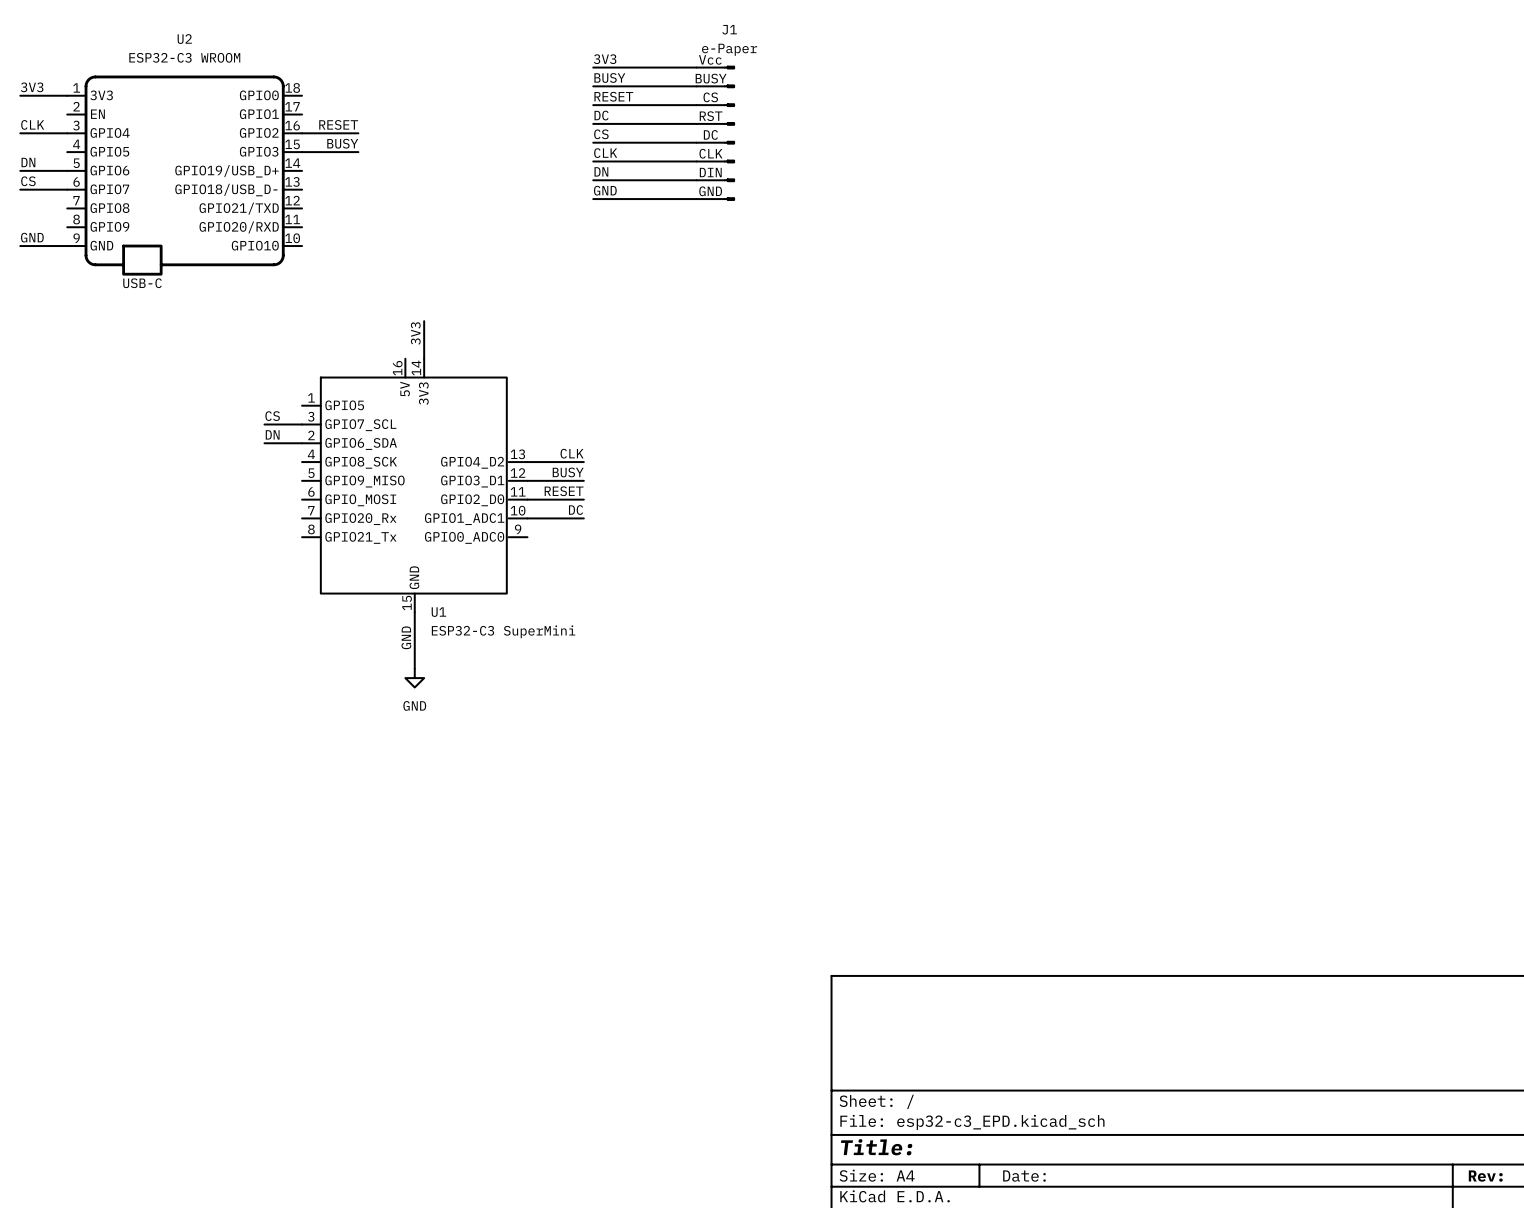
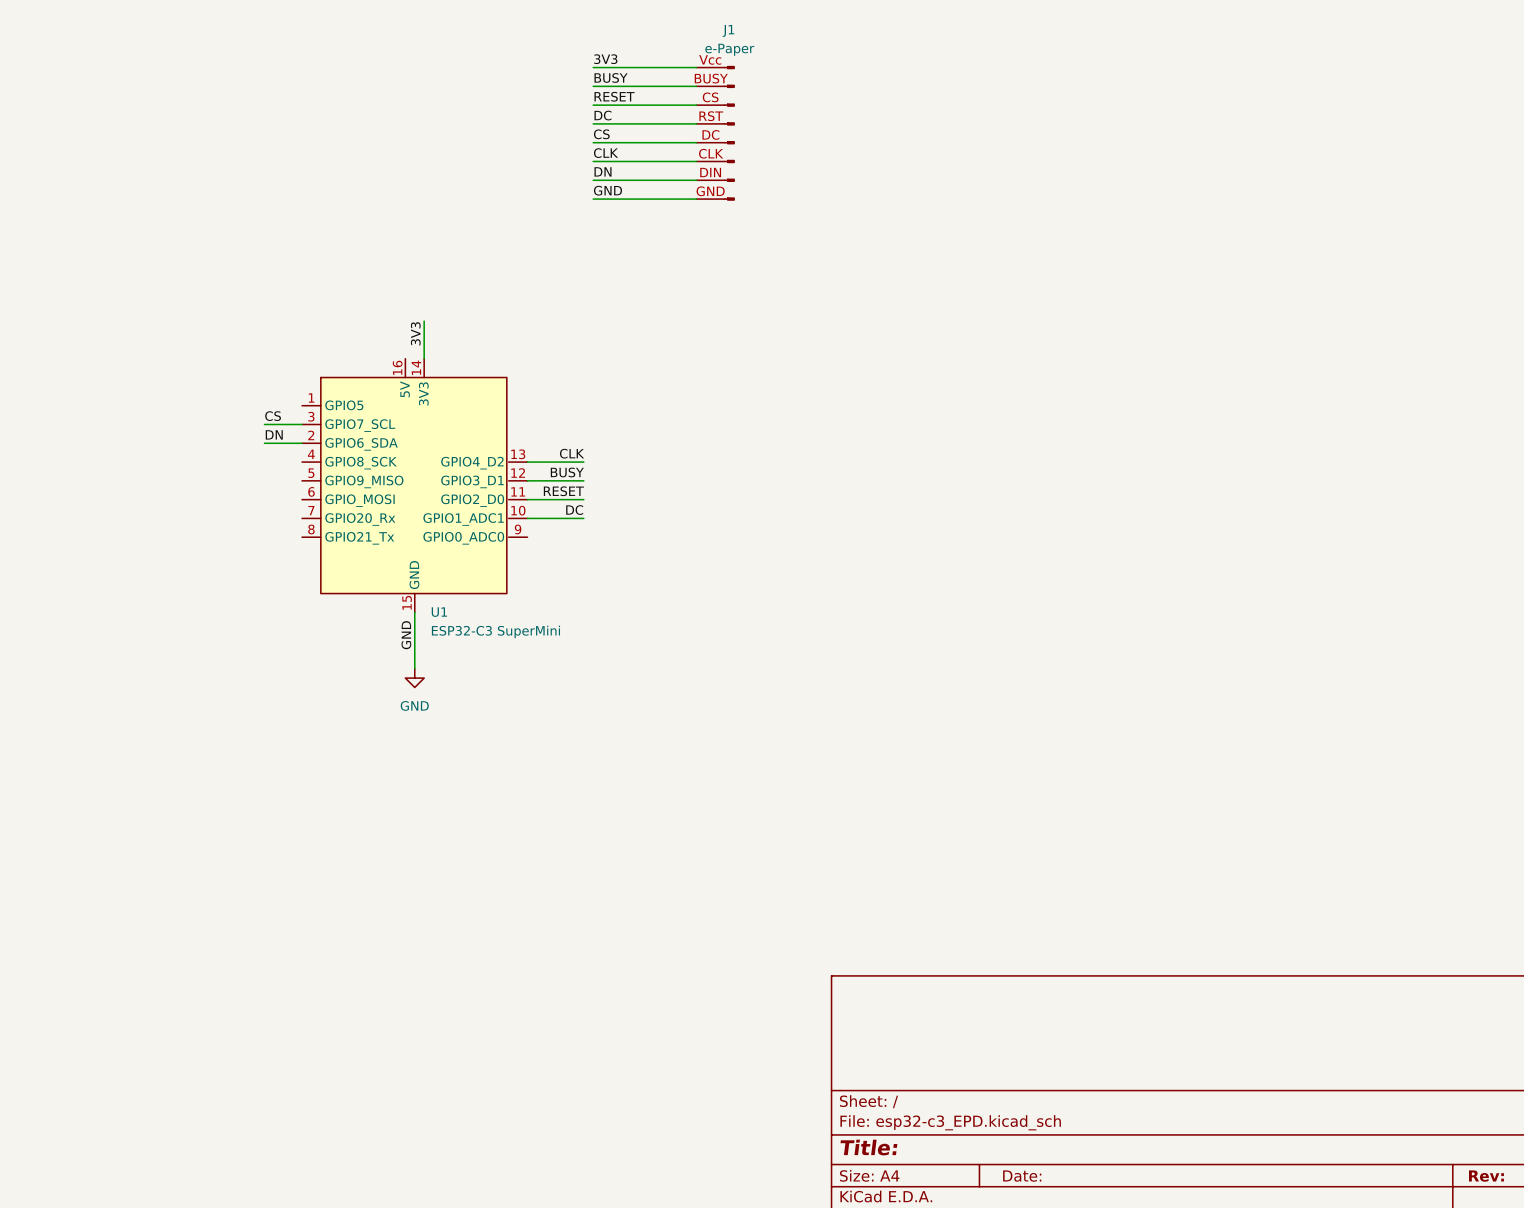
label: 3V3 (32, 87) -> none
wire: (20, 95) (67, 95) -> none
label: CLK (32, 124) -> none
label: RESET (338, 124) -> none
wire: (20, 133) (67, 133) -> none
wire: (302, 133) (358, 133) -> none
label: BUSY (342, 143) -> none
wire: (302, 152) (358, 152) -> none
label: DN (28, 162) -> none
wire: (20, 170) (67, 170) -> none
U2: ESP32-C3 WROOM (184, 175) -> none
label: CS (28, 181) -> none
wire: (20, 189) (67, 189) -> none
label: GND (32, 237) -> none
wire: (20, 246) (67, 246) -> none

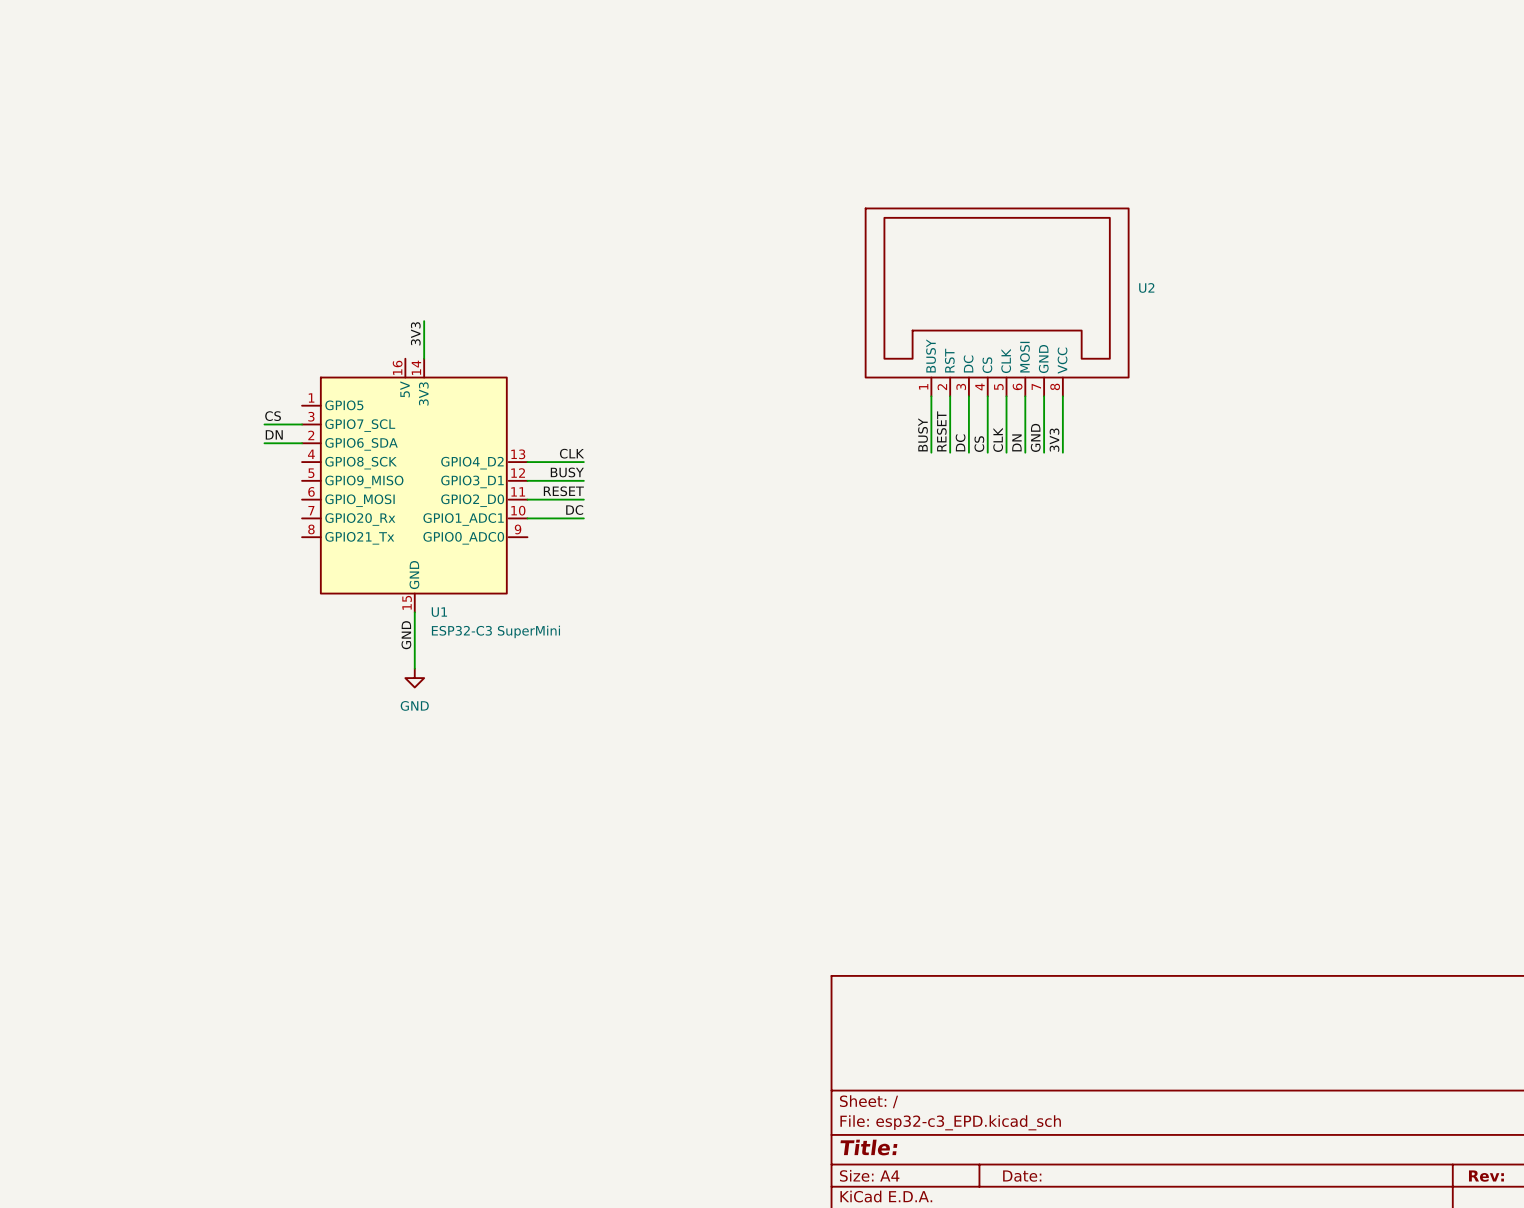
label: 3V3 (605, 59) -> none
wire: (593, 67) (696, 67) -> none
label: BUSY (611, 77) -> none
wire: (593, 86) (696, 86) -> none
label: RESET (614, 96) -> none
wire: (593, 105) (696, 105) -> none
label: DC (602, 115) -> none
wire: (593, 123) (696, 123) -> none
J1: e-Paper (715, 133) -> none
label: CS (601, 134) -> none
wire: (593, 142) (696, 142) -> none
label: CLK (606, 153) -> none
wire: (593, 161) (696, 161) -> none
label: DN (603, 171) -> none
wire: (593, 180) (696, 180) -> none
label: GND (607, 190) -> none
wire: (593, 199) (696, 199) -> none
U2: none -> (997, 302)
wire: none -> (931, 396) (931, 452)
wire: none -> (950, 396) (950, 452)
wire: none -> (968, 396) (968, 452)
wire: none -> (987, 396) (987, 452)
wire: none -> (1006, 396) (1006, 452)
wire: none -> (1025, 396) (1025, 452)
wire: none -> (1044, 396) (1044, 452)
wire: none -> (1062, 396) (1062, 452)
label: none -> RESET (941, 431)
label: none -> BUSY (923, 434)
label: none -> GND (1035, 437)
label: none -> CLK (998, 439)
label: none -> 3V3 (1054, 440)
label: none -> DC (960, 442)
label: none -> DN (1016, 442)
label: none -> CS (979, 444)

